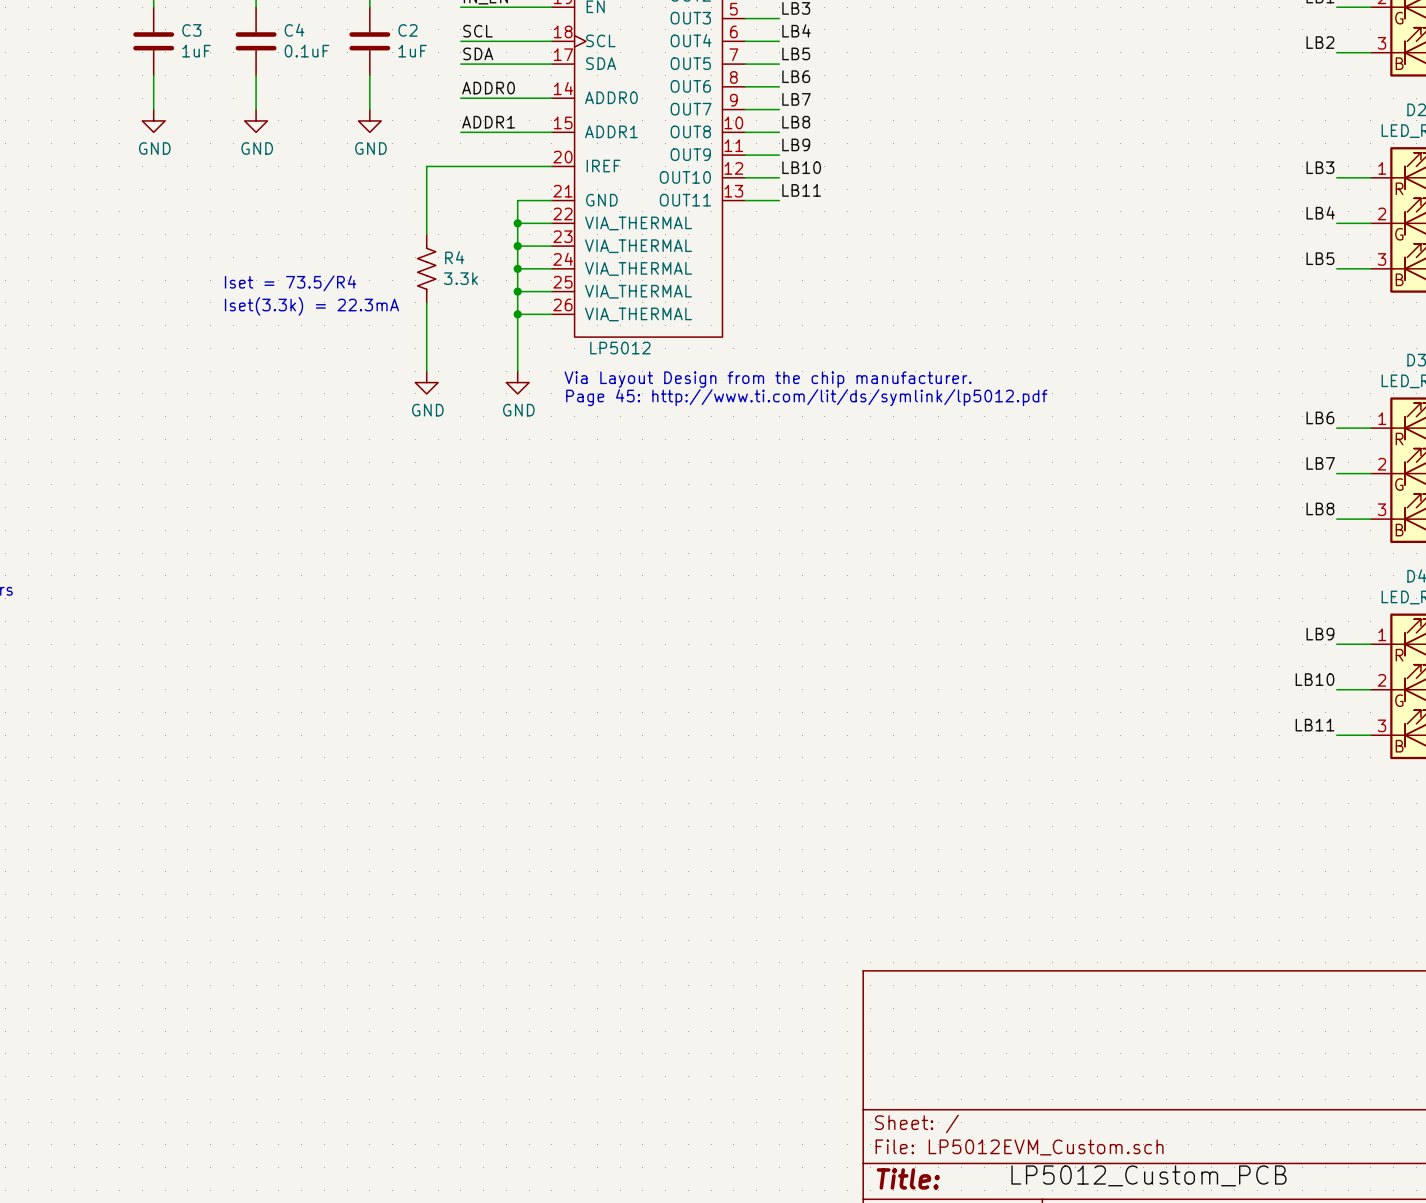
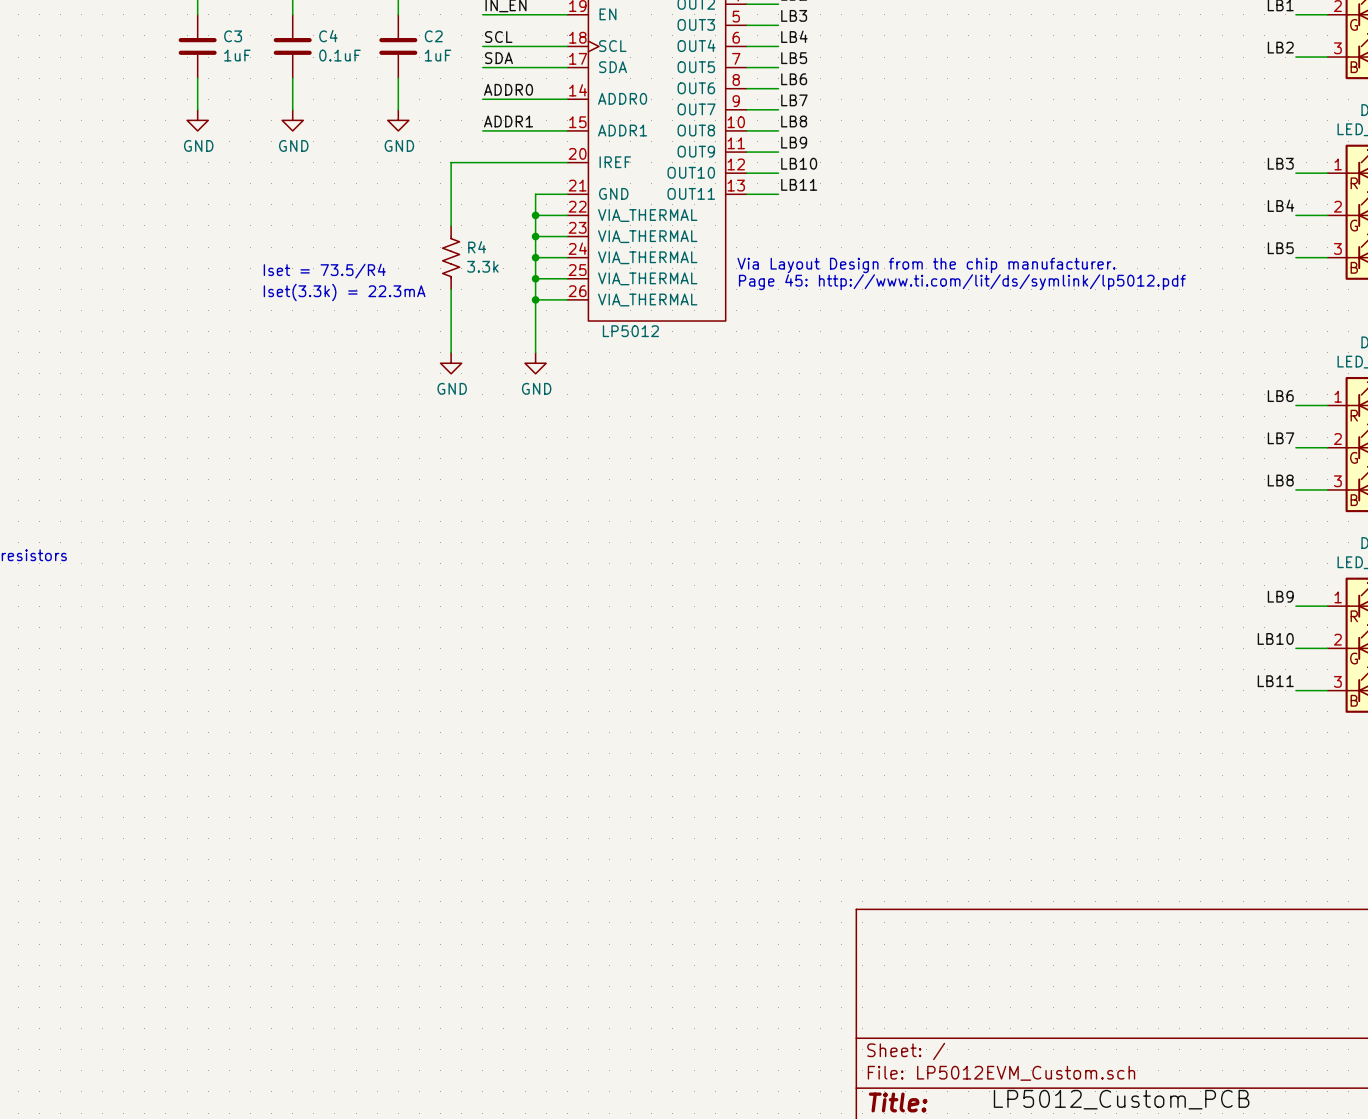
text position: Via Layout Design from the chip manufacturer. (768, 379) -> Via Layout Design from the chip manufacturer. (926, 265)
text position: Page 45: http://www.ti.com/lit/ds/symlink/lp5012.pdf (806, 397) -> Page 45: http://www.ti.com/lit/ds/symlink/lp5012.pdf (962, 282)

